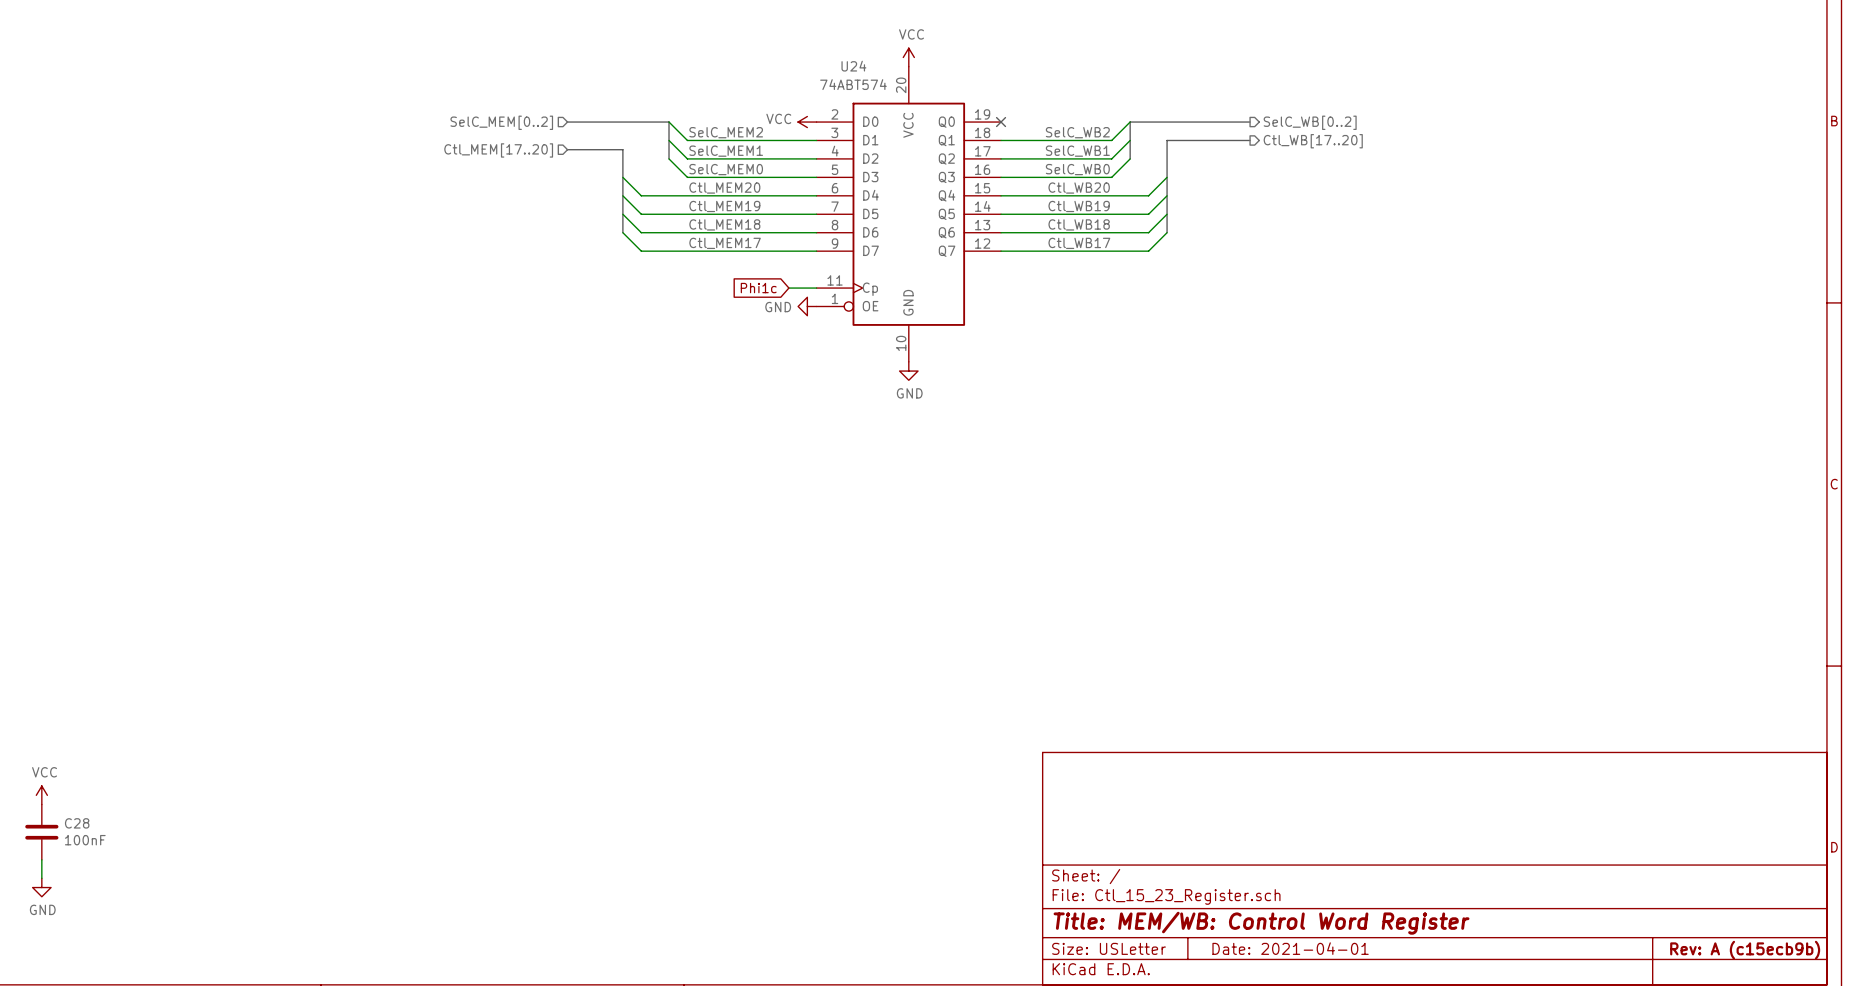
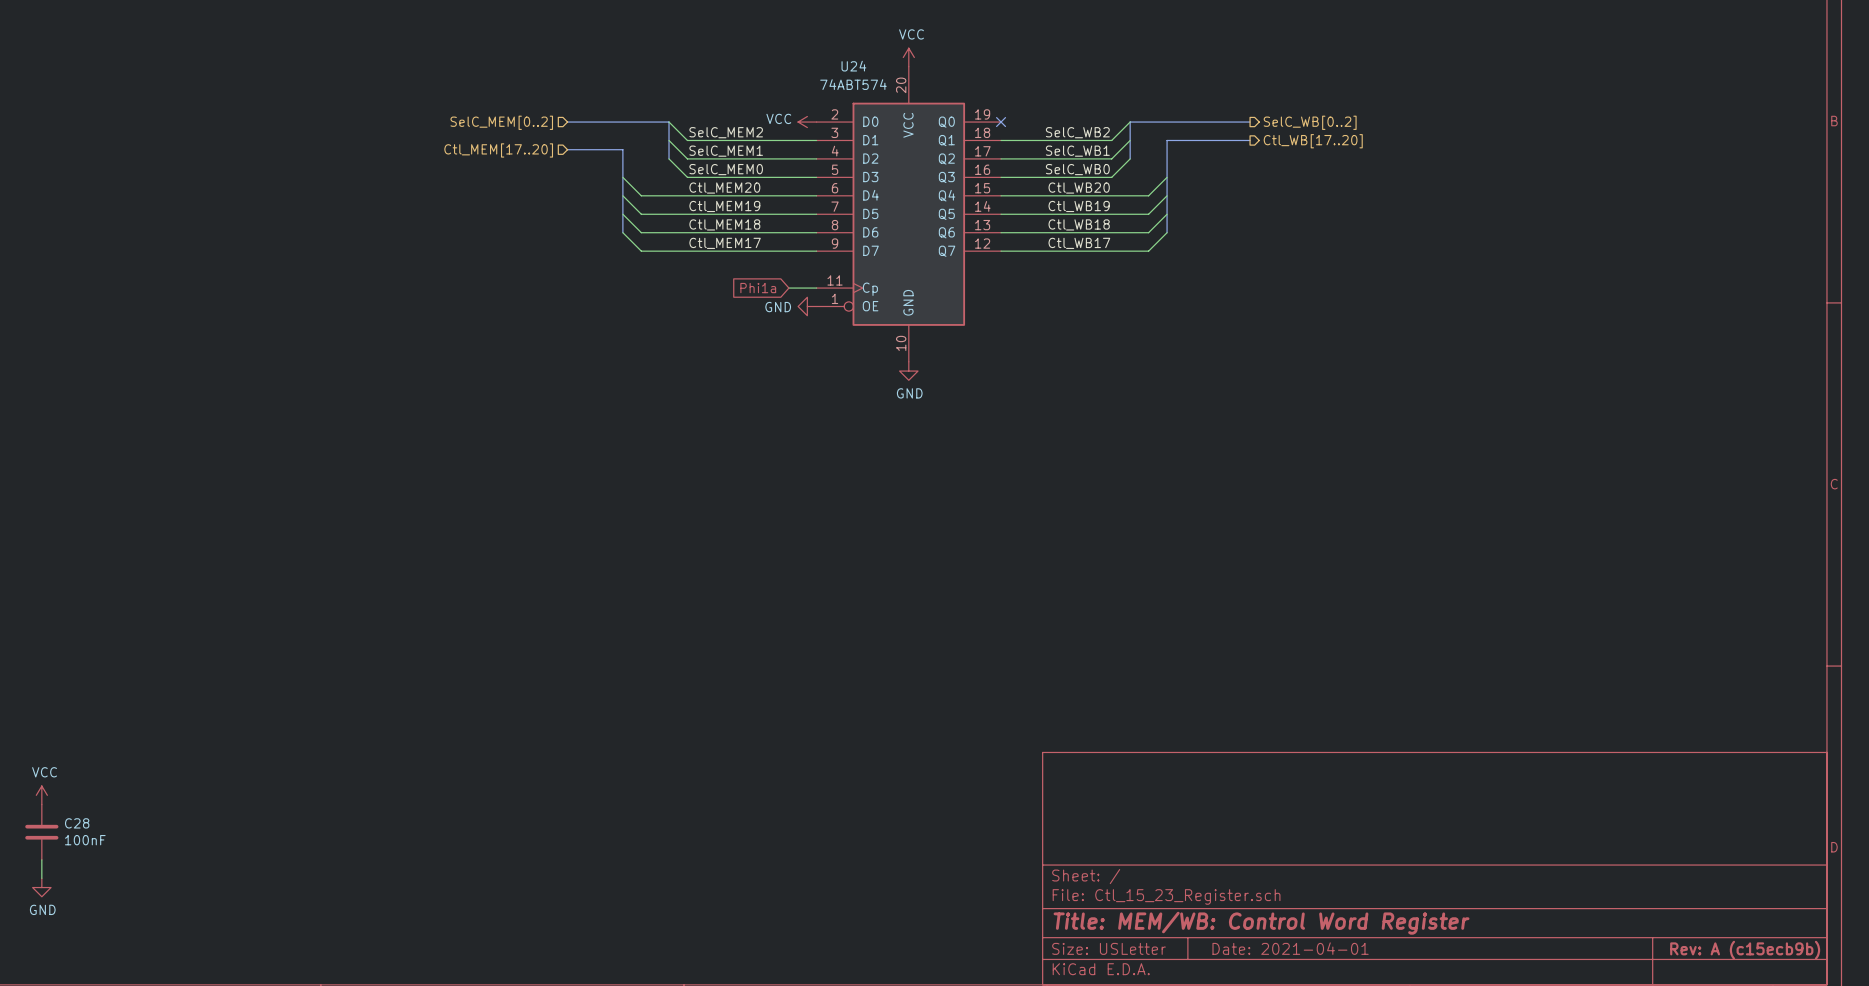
global label: Phi1c (758, 288) -> Phi1a (758, 288)

